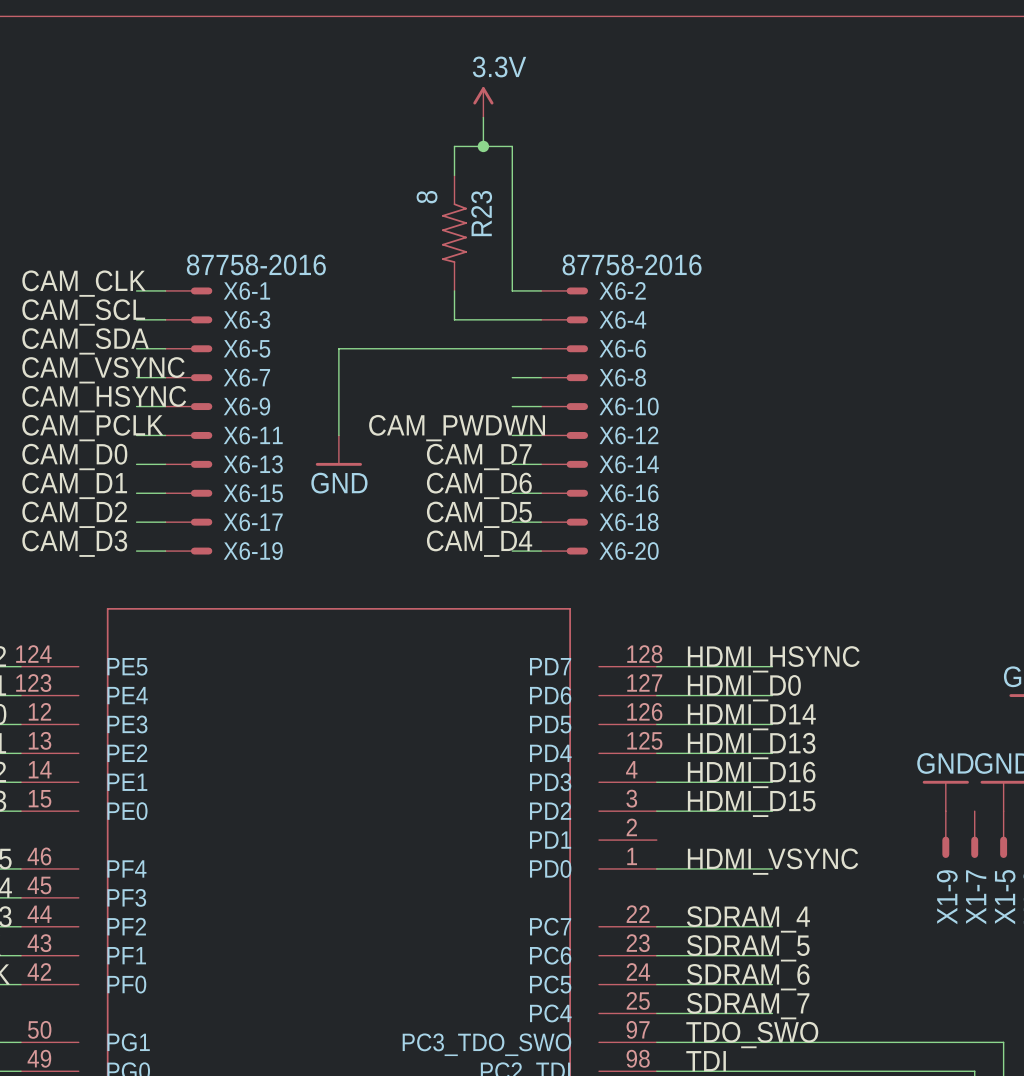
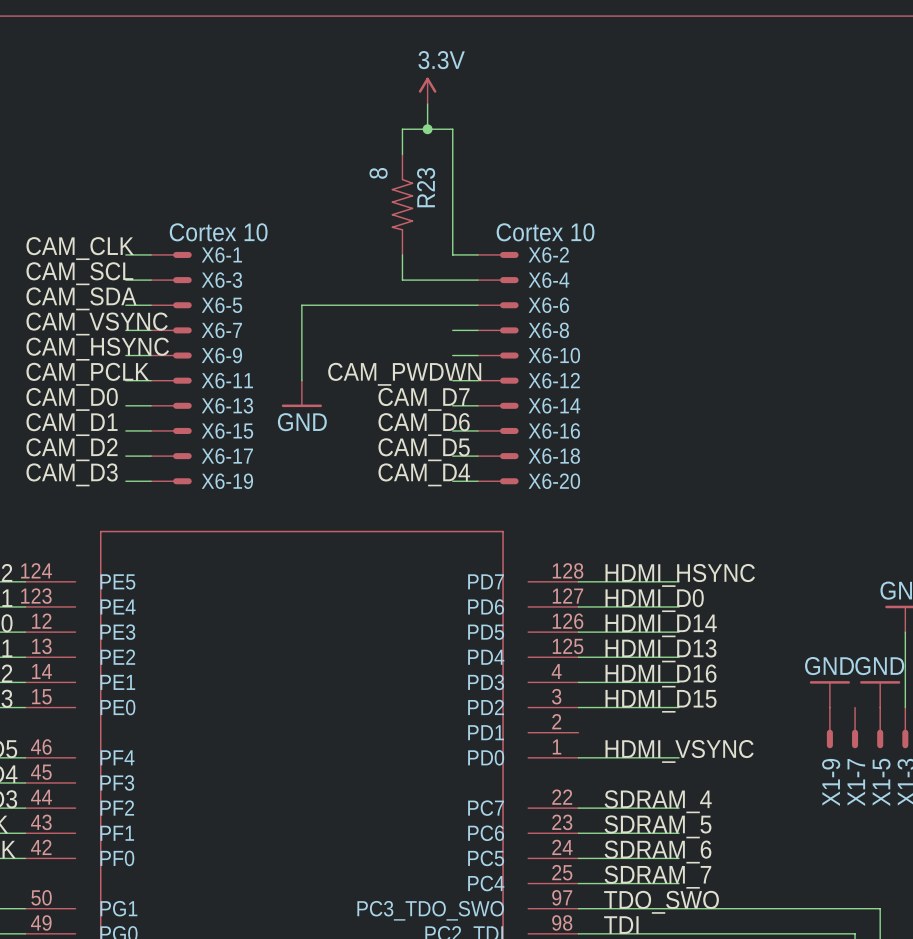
X6-1 value: 87758-2016 (256, 264) -> Cortex 10 (218, 232)
X6-2 value: 87758-2016 (632, 264) -> Cortex 10 (545, 232)

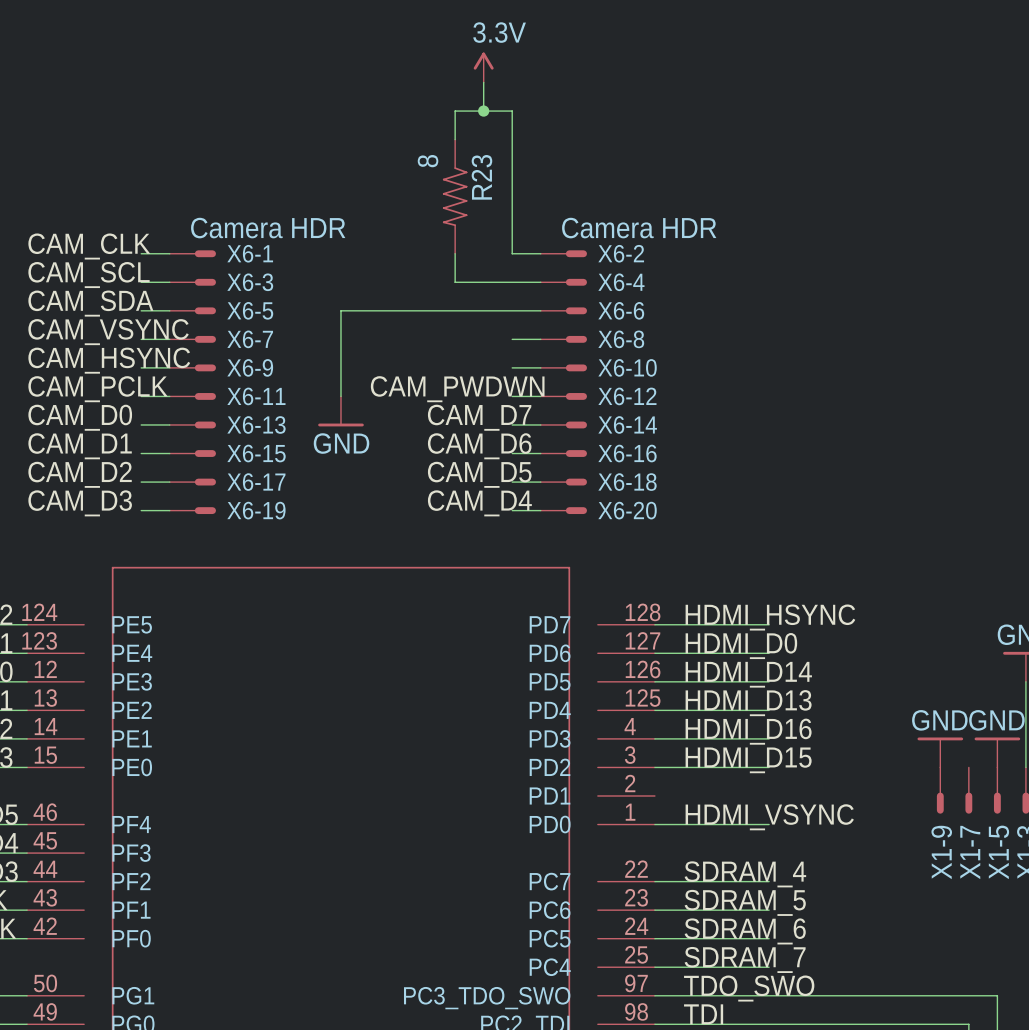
X6-1 value: Cortex 10 (218, 232) -> Camera HDR (268, 228)
X6-2 value: Cortex 10 (545, 232) -> Camera HDR (639, 228)

